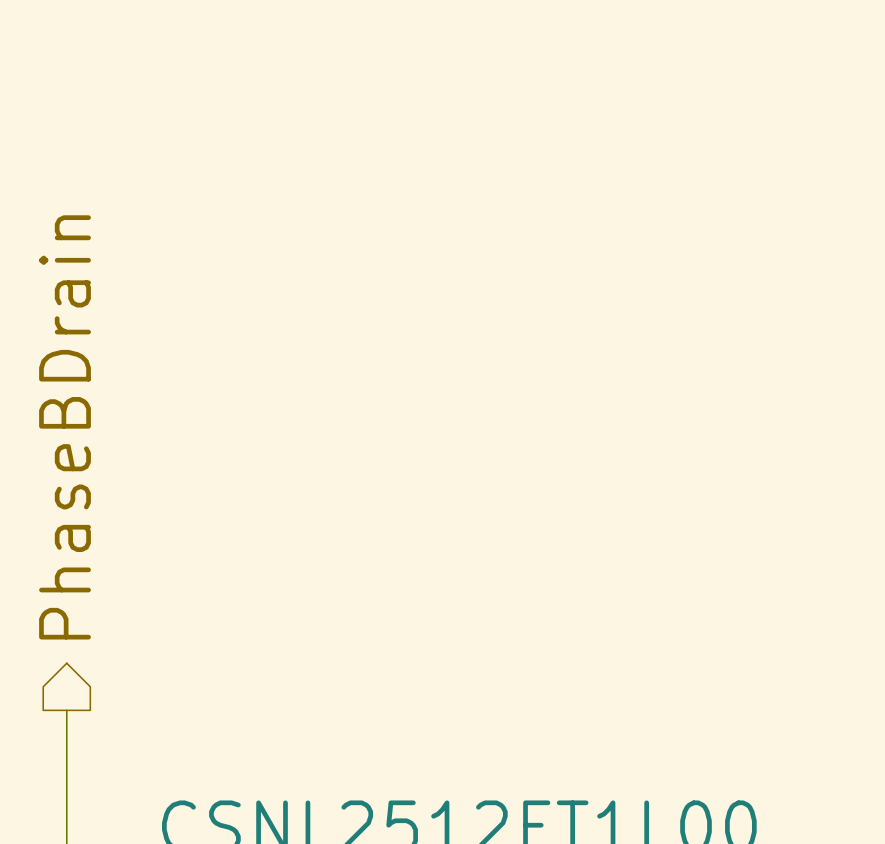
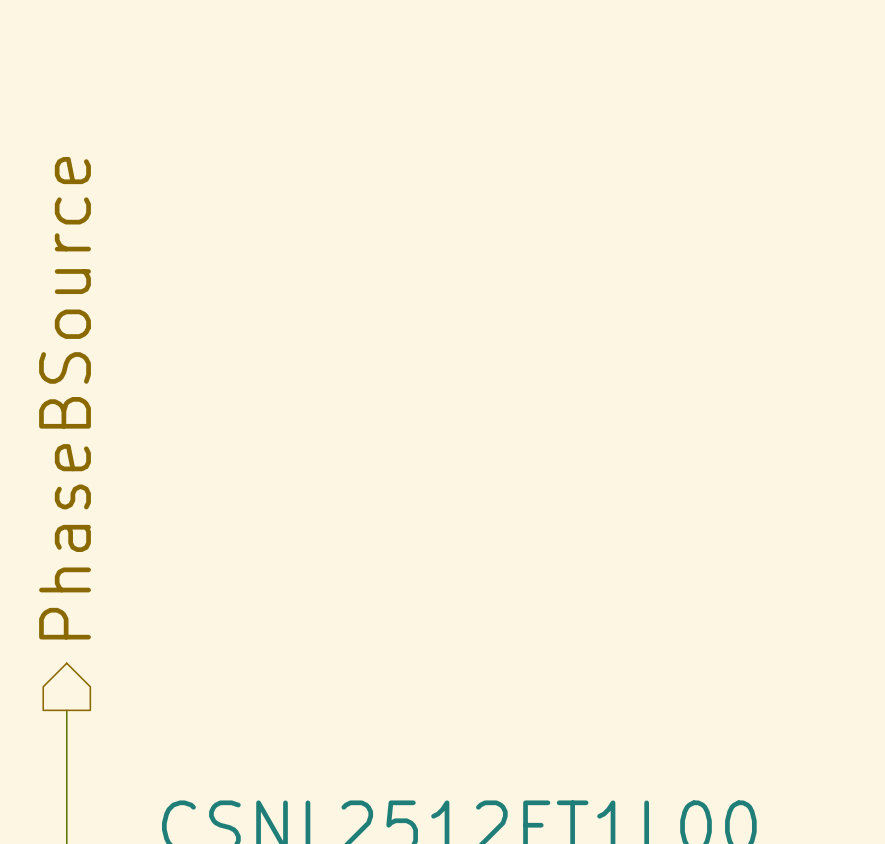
hierarchical label: PhaseBDrain (65, 427) -> PhaseBSource (65, 398)

